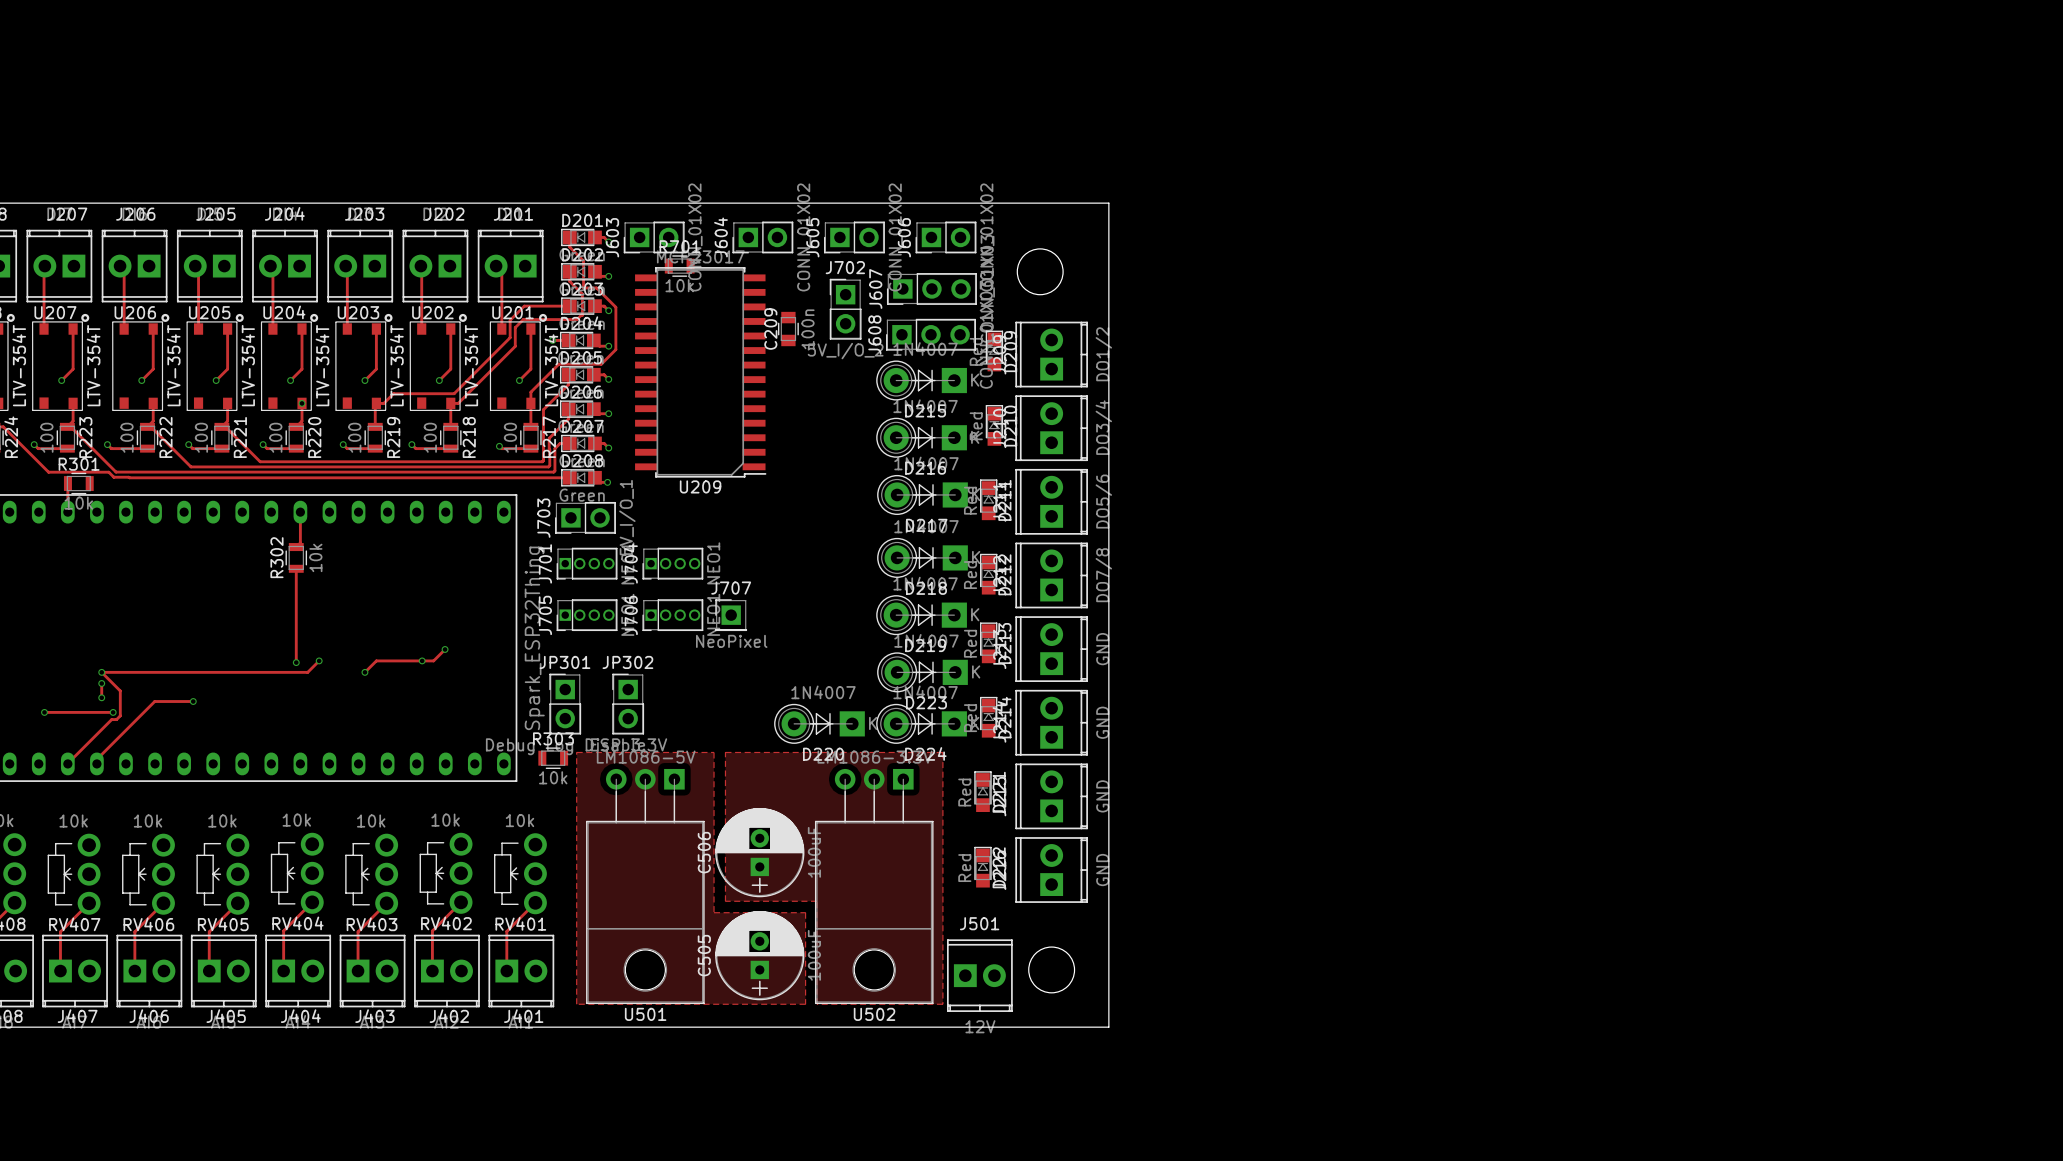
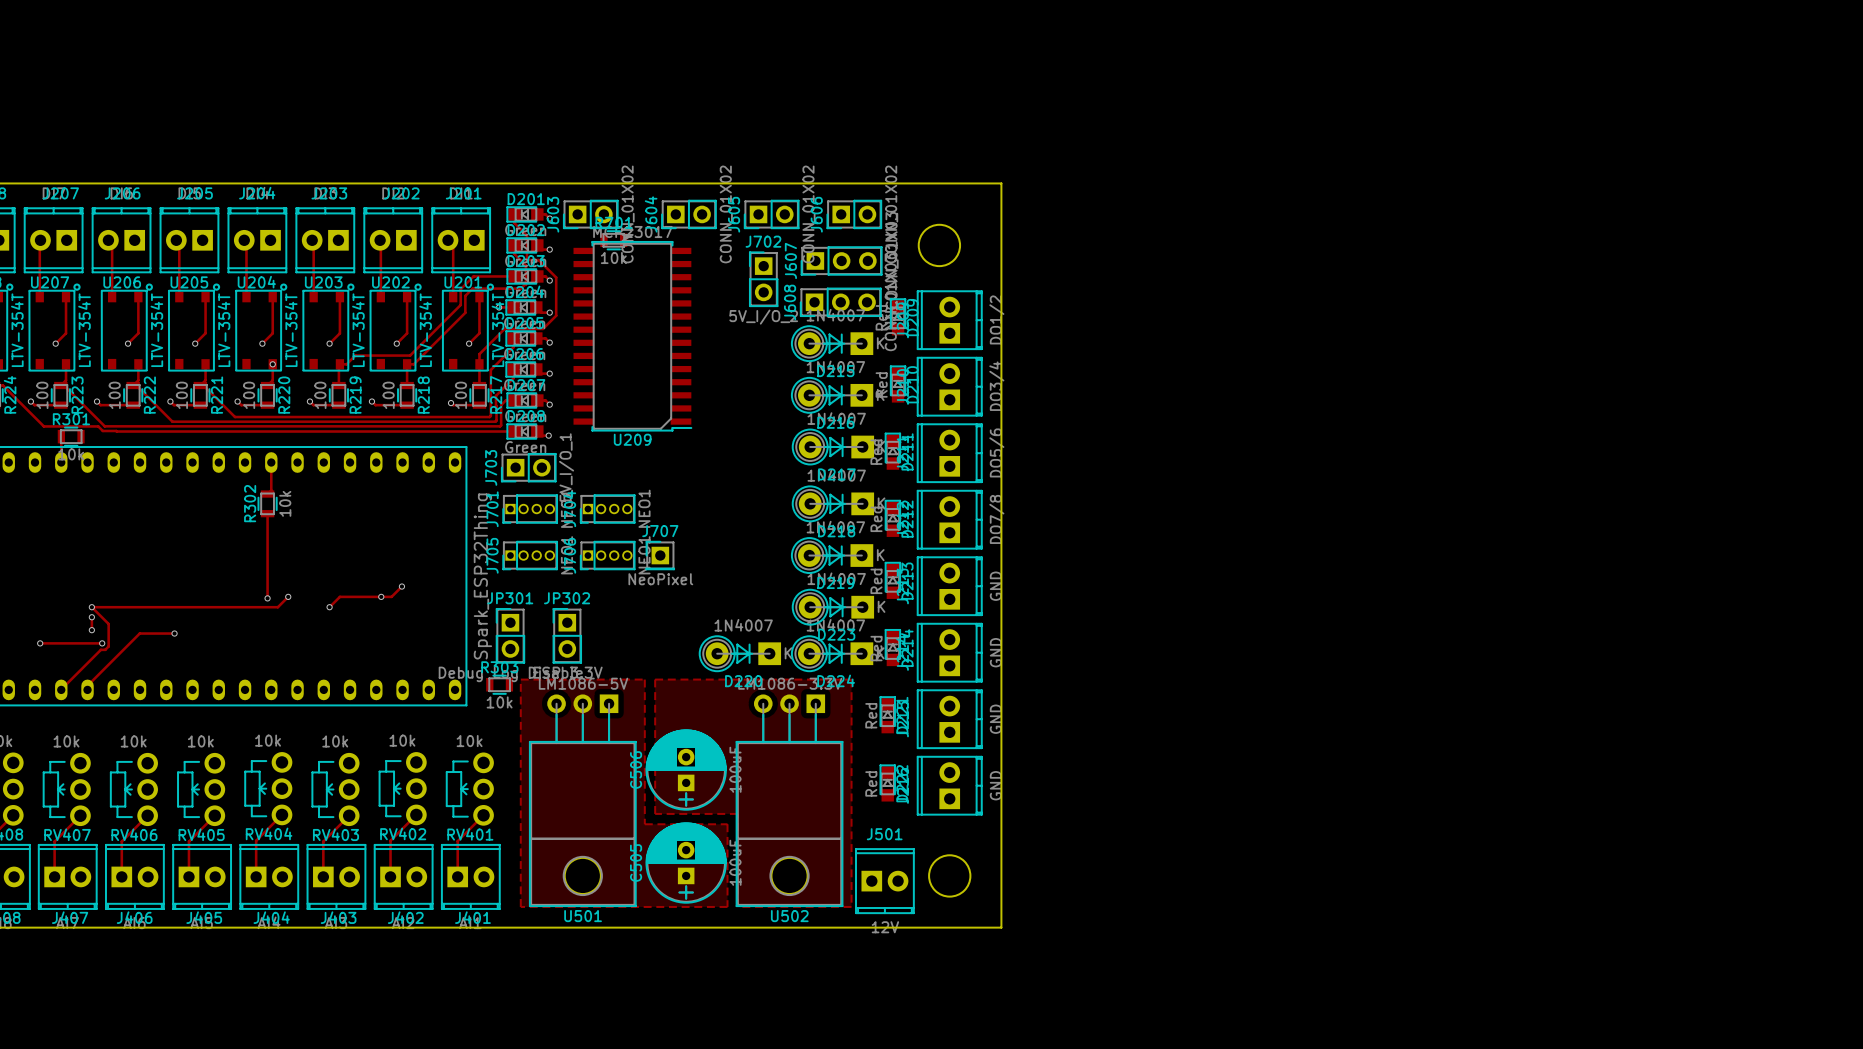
C209: 100n (788, 329) -> none

